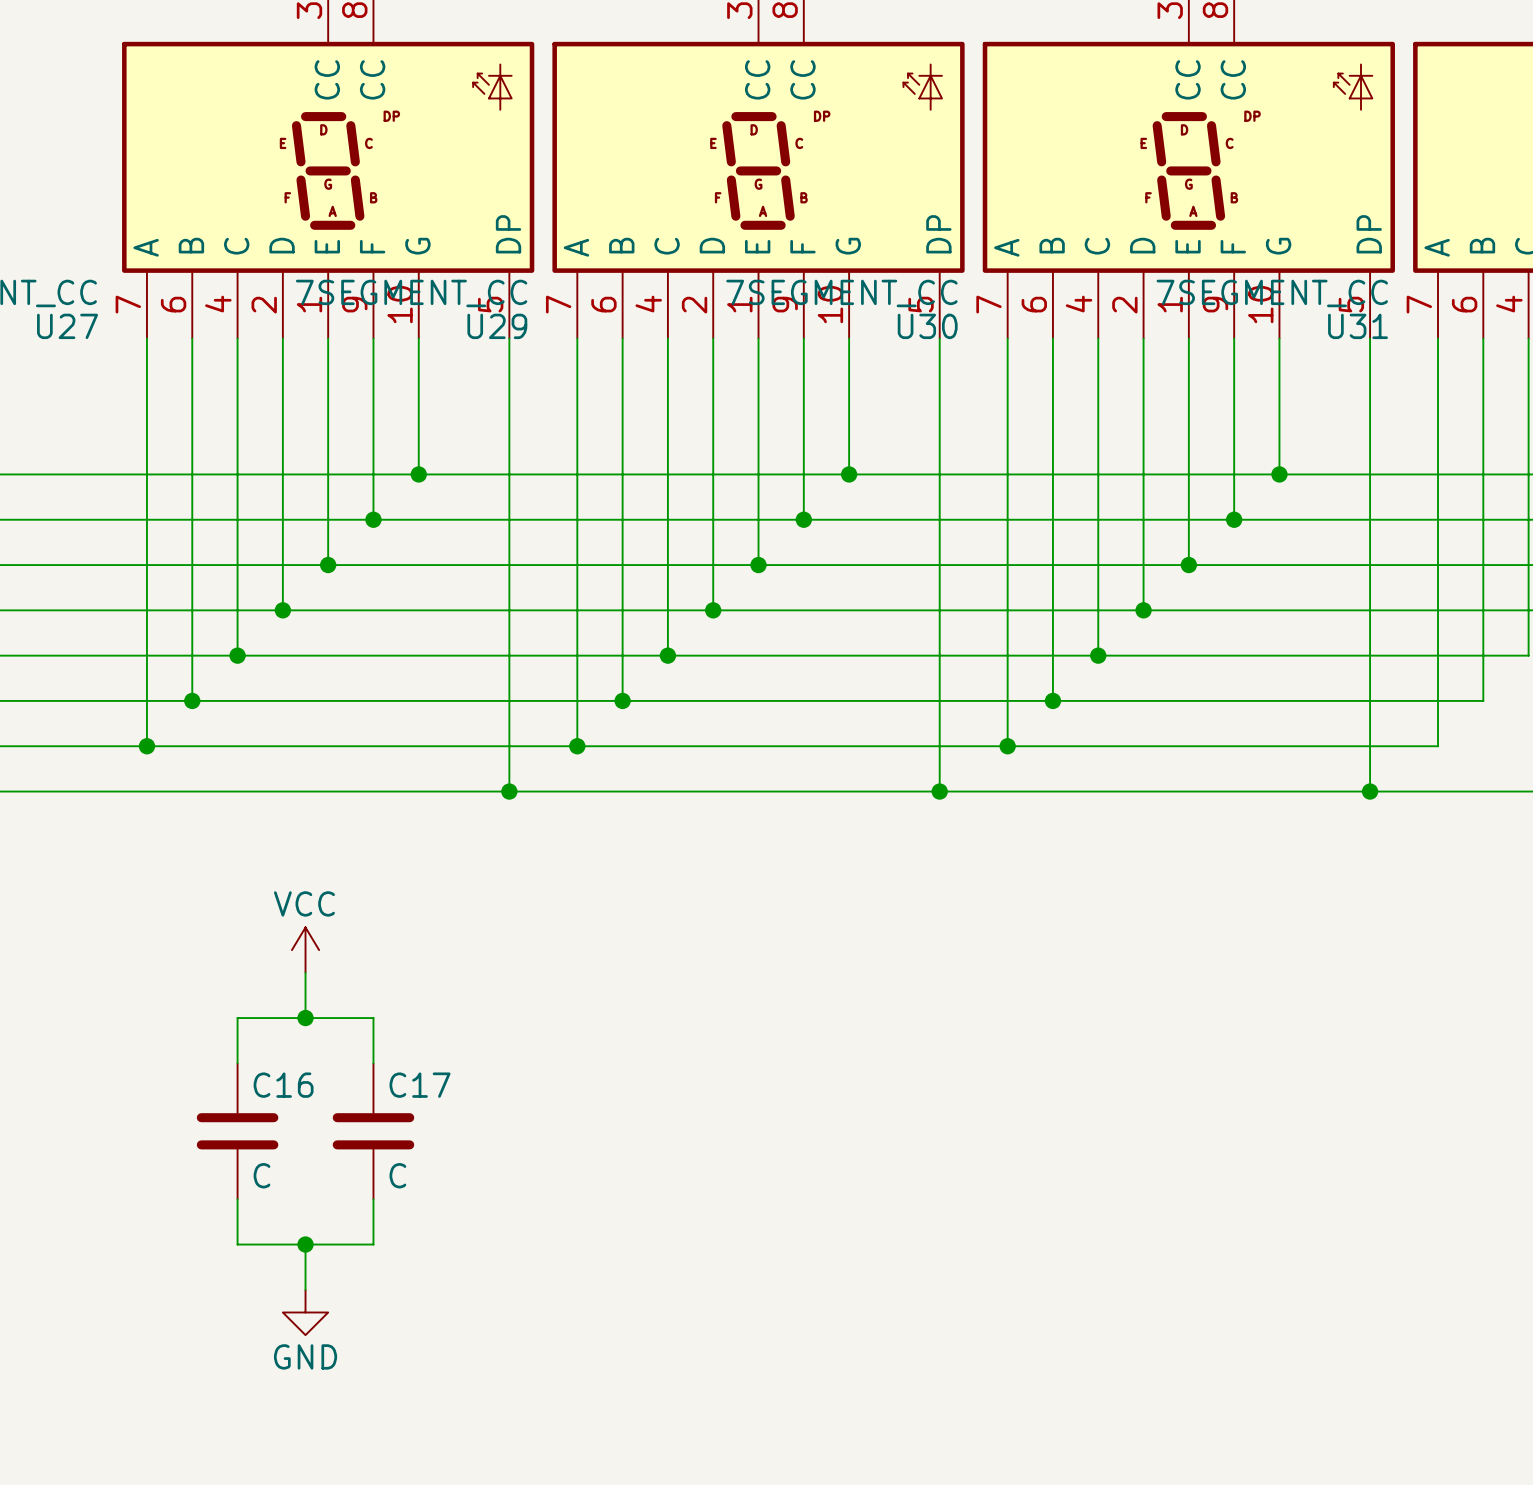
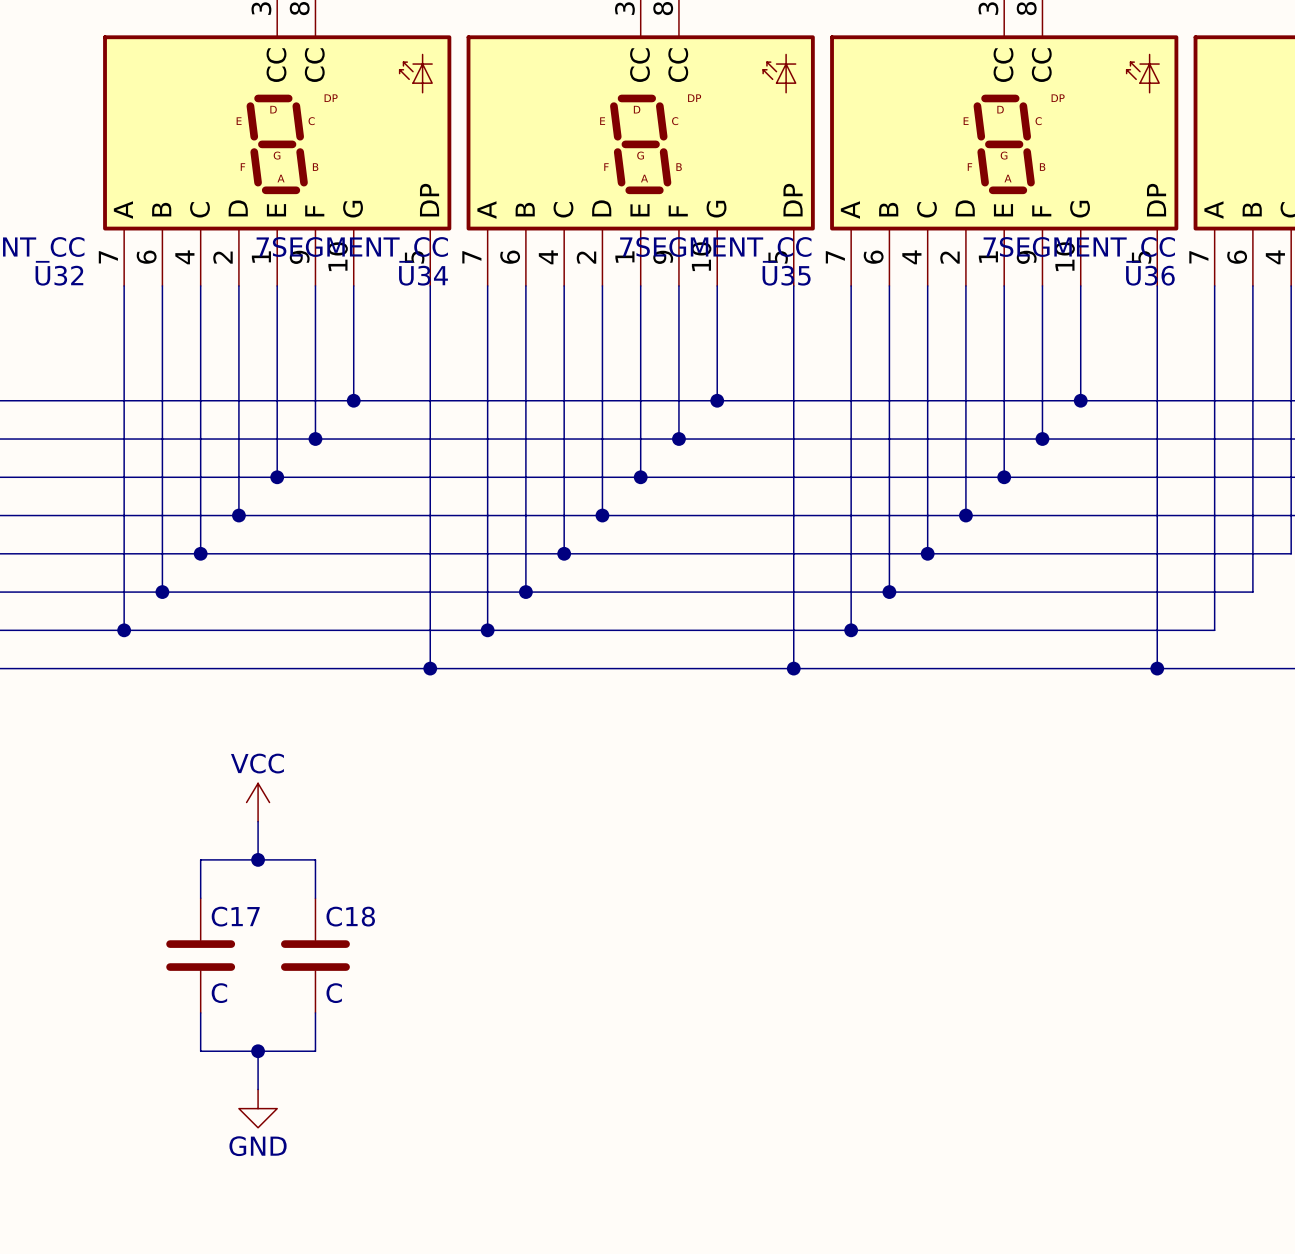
U27 name: U27 (67, 326) -> U32 (59, 275)
U29 name: U29 (497, 326) -> U34 (423, 275)
U30 name: U30 (927, 326) -> U35 (786, 275)
U31 name: U31 (1358, 326) -> U36 (1150, 275)
C16 name: C16 (283, 1085) -> C17 (235, 916)
C17 name: C17 (420, 1085) -> C18 (350, 916)

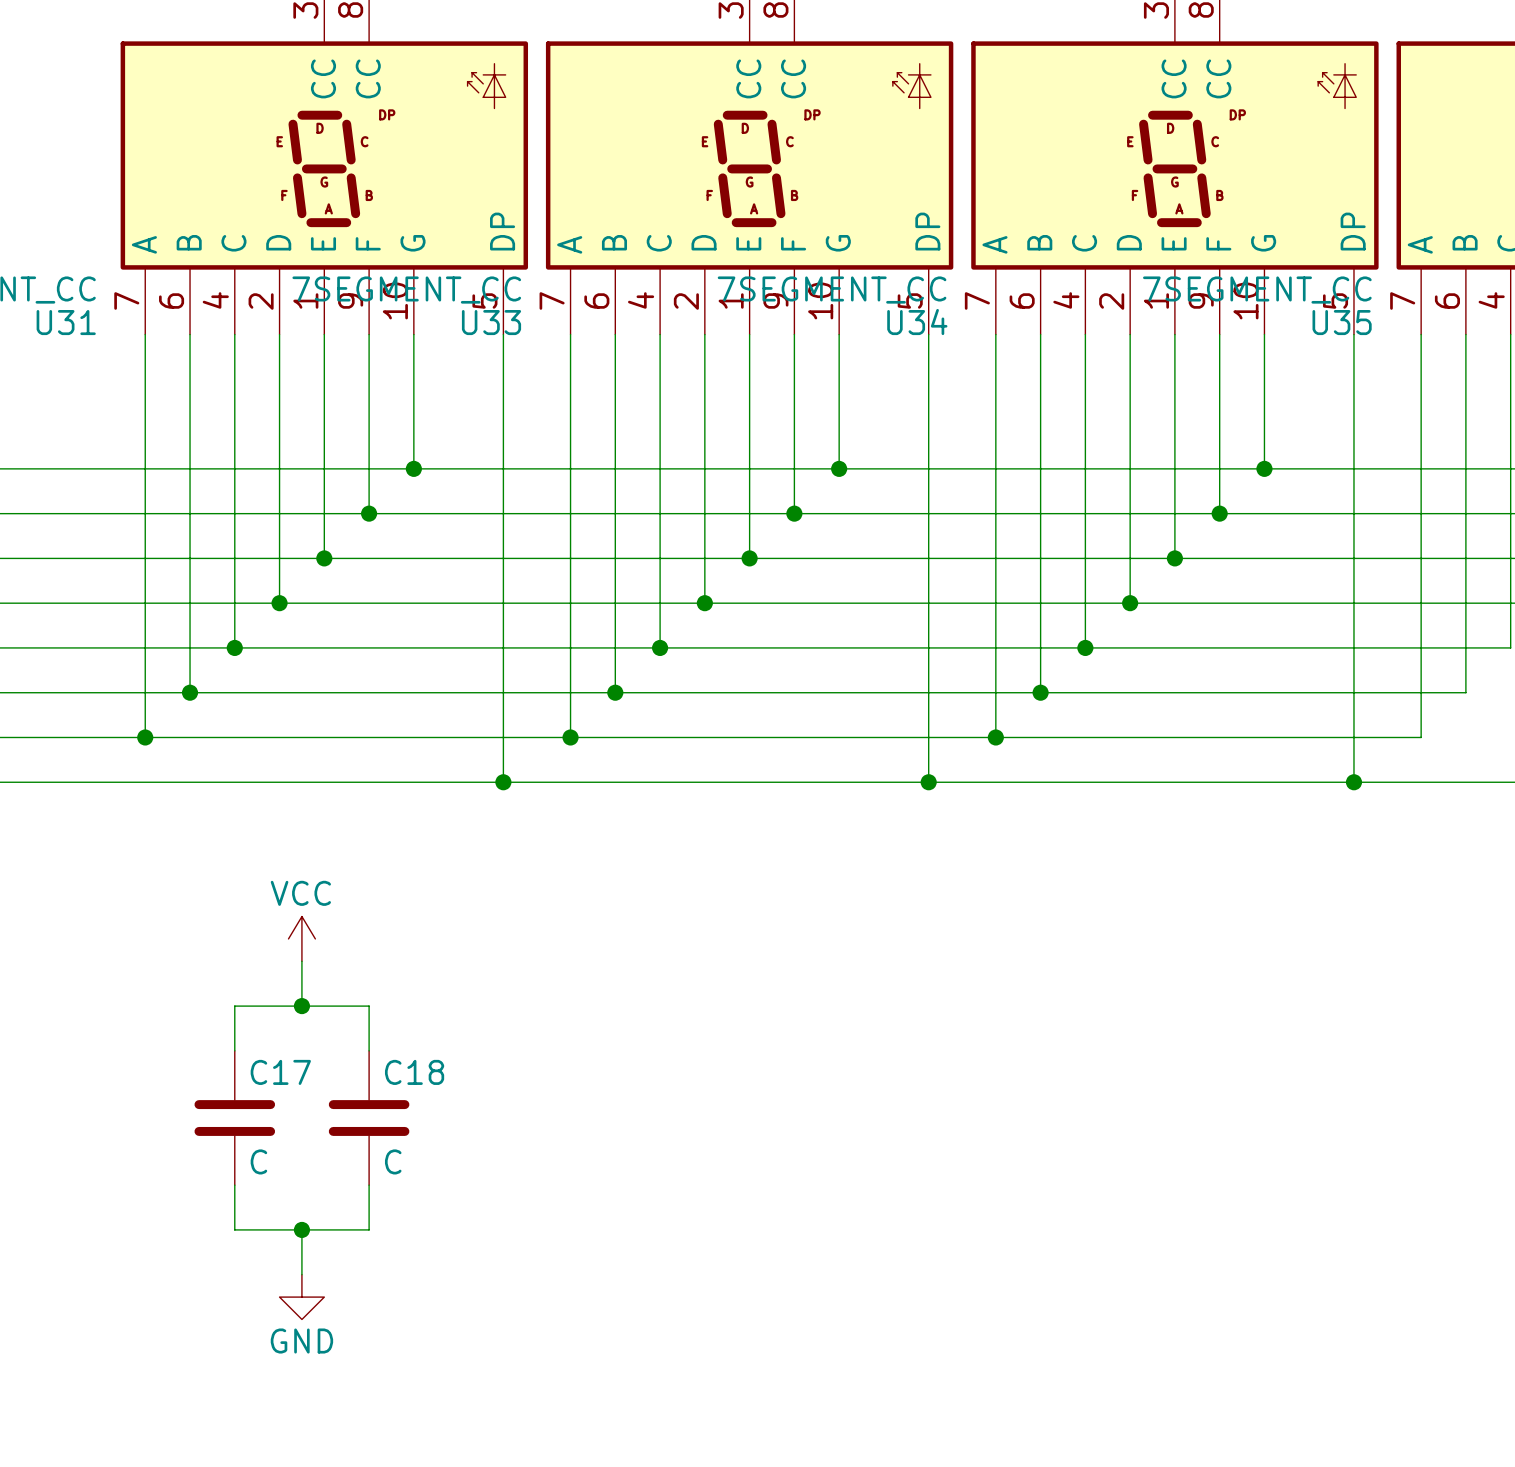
U32 name: U32 (59, 275) -> U31 (66, 322)
U34 name: U34 (423, 275) -> U33 (491, 322)
U35 name: U35 (786, 275) -> U34 (917, 322)
U36 name: U36 (1150, 275) -> U35 (1342, 322)

